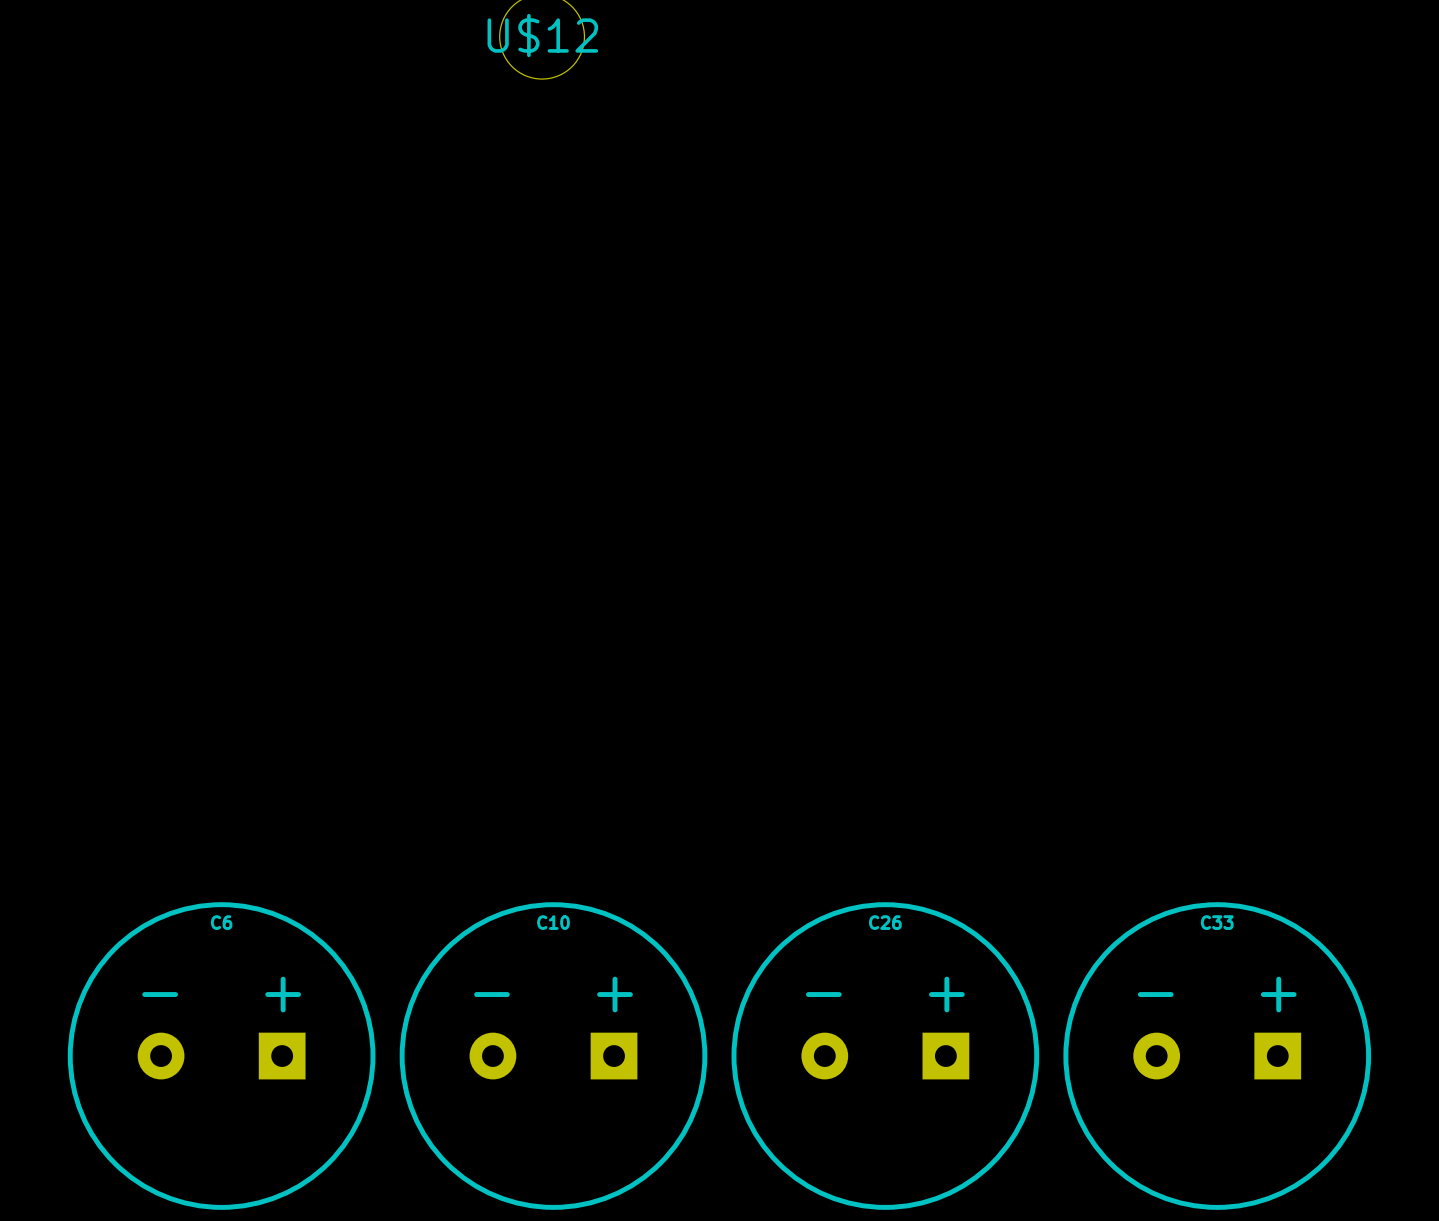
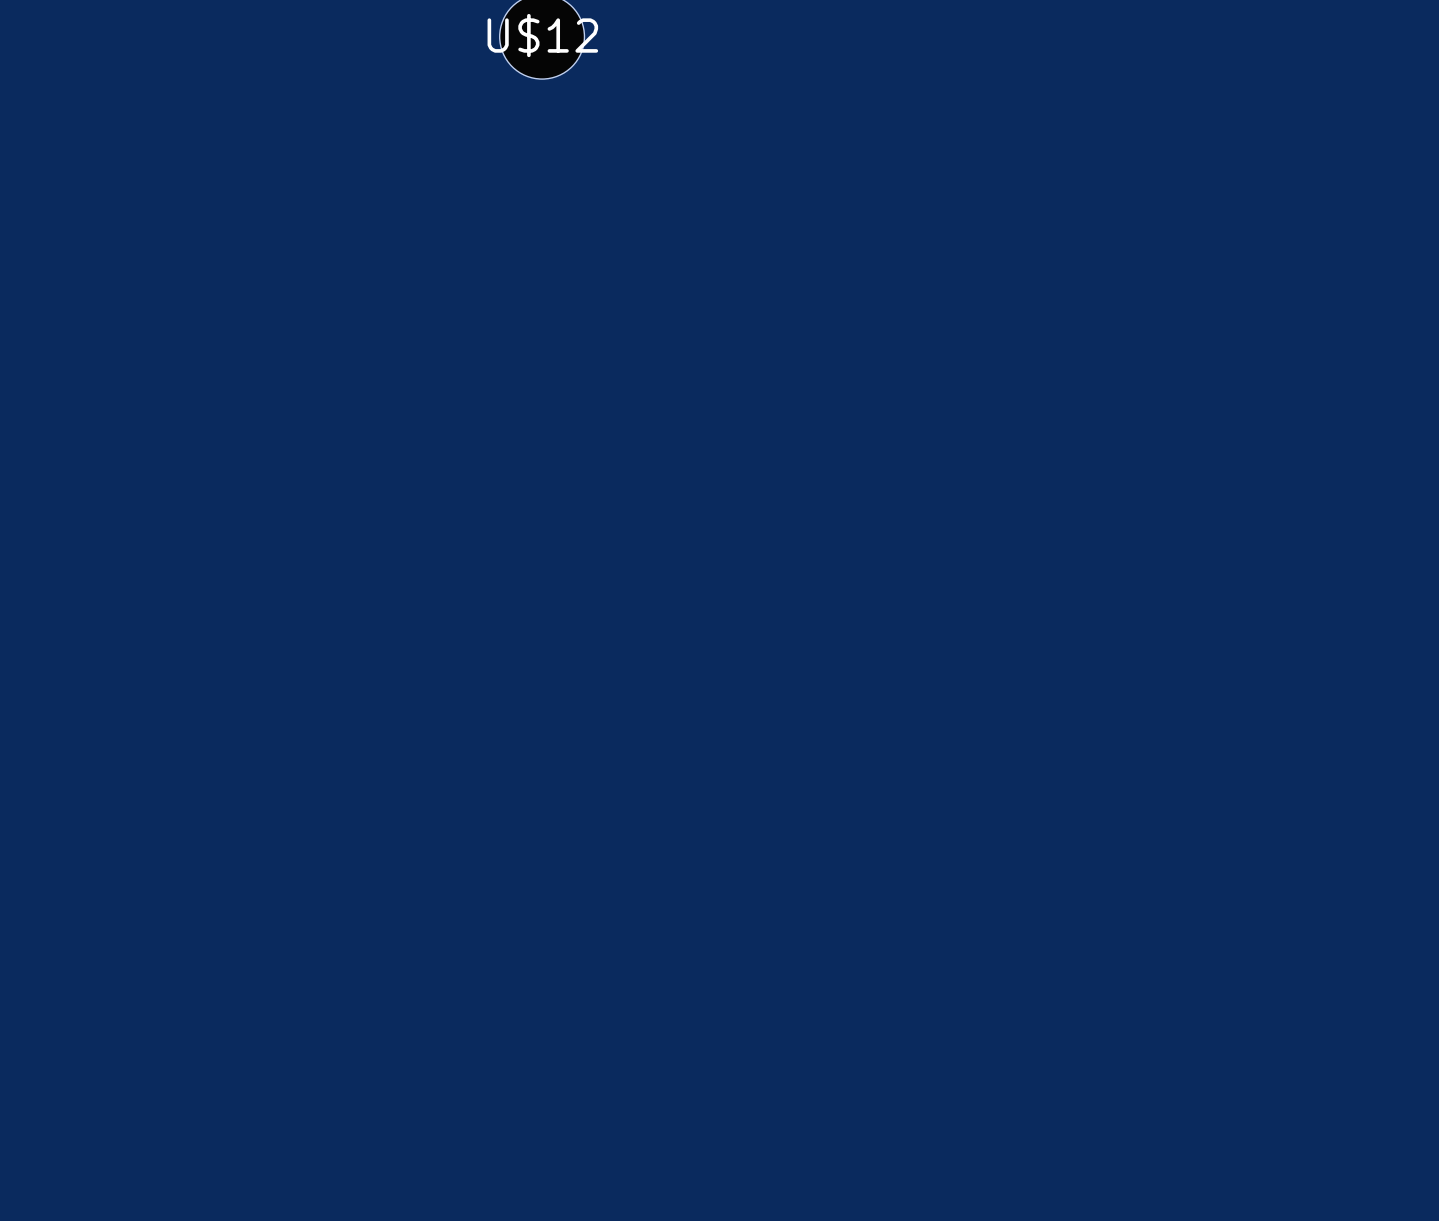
C6: (221, 1056) -> none
C10: (553, 1056) -> none
C26: (885, 1056) -> none
C33: (1217, 1056) -> none

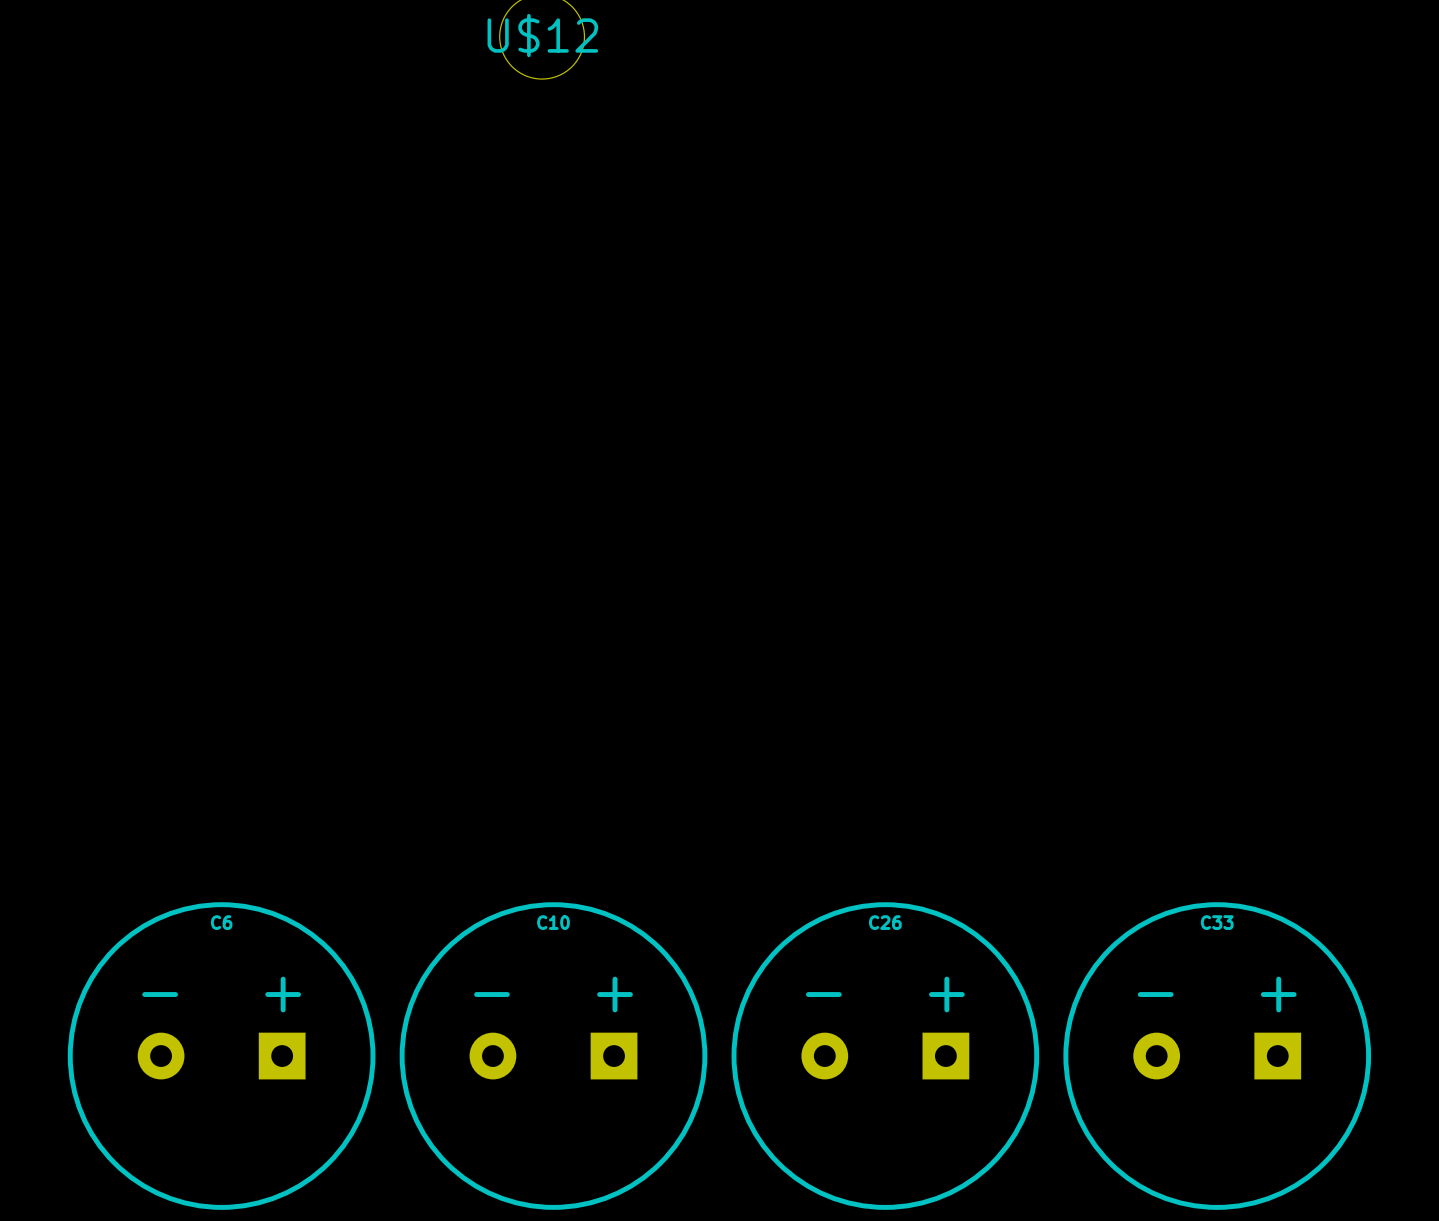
C6: none -> (221, 1056)
C10: none -> (553, 1056)
C26: none -> (885, 1056)
C33: none -> (1217, 1056)

